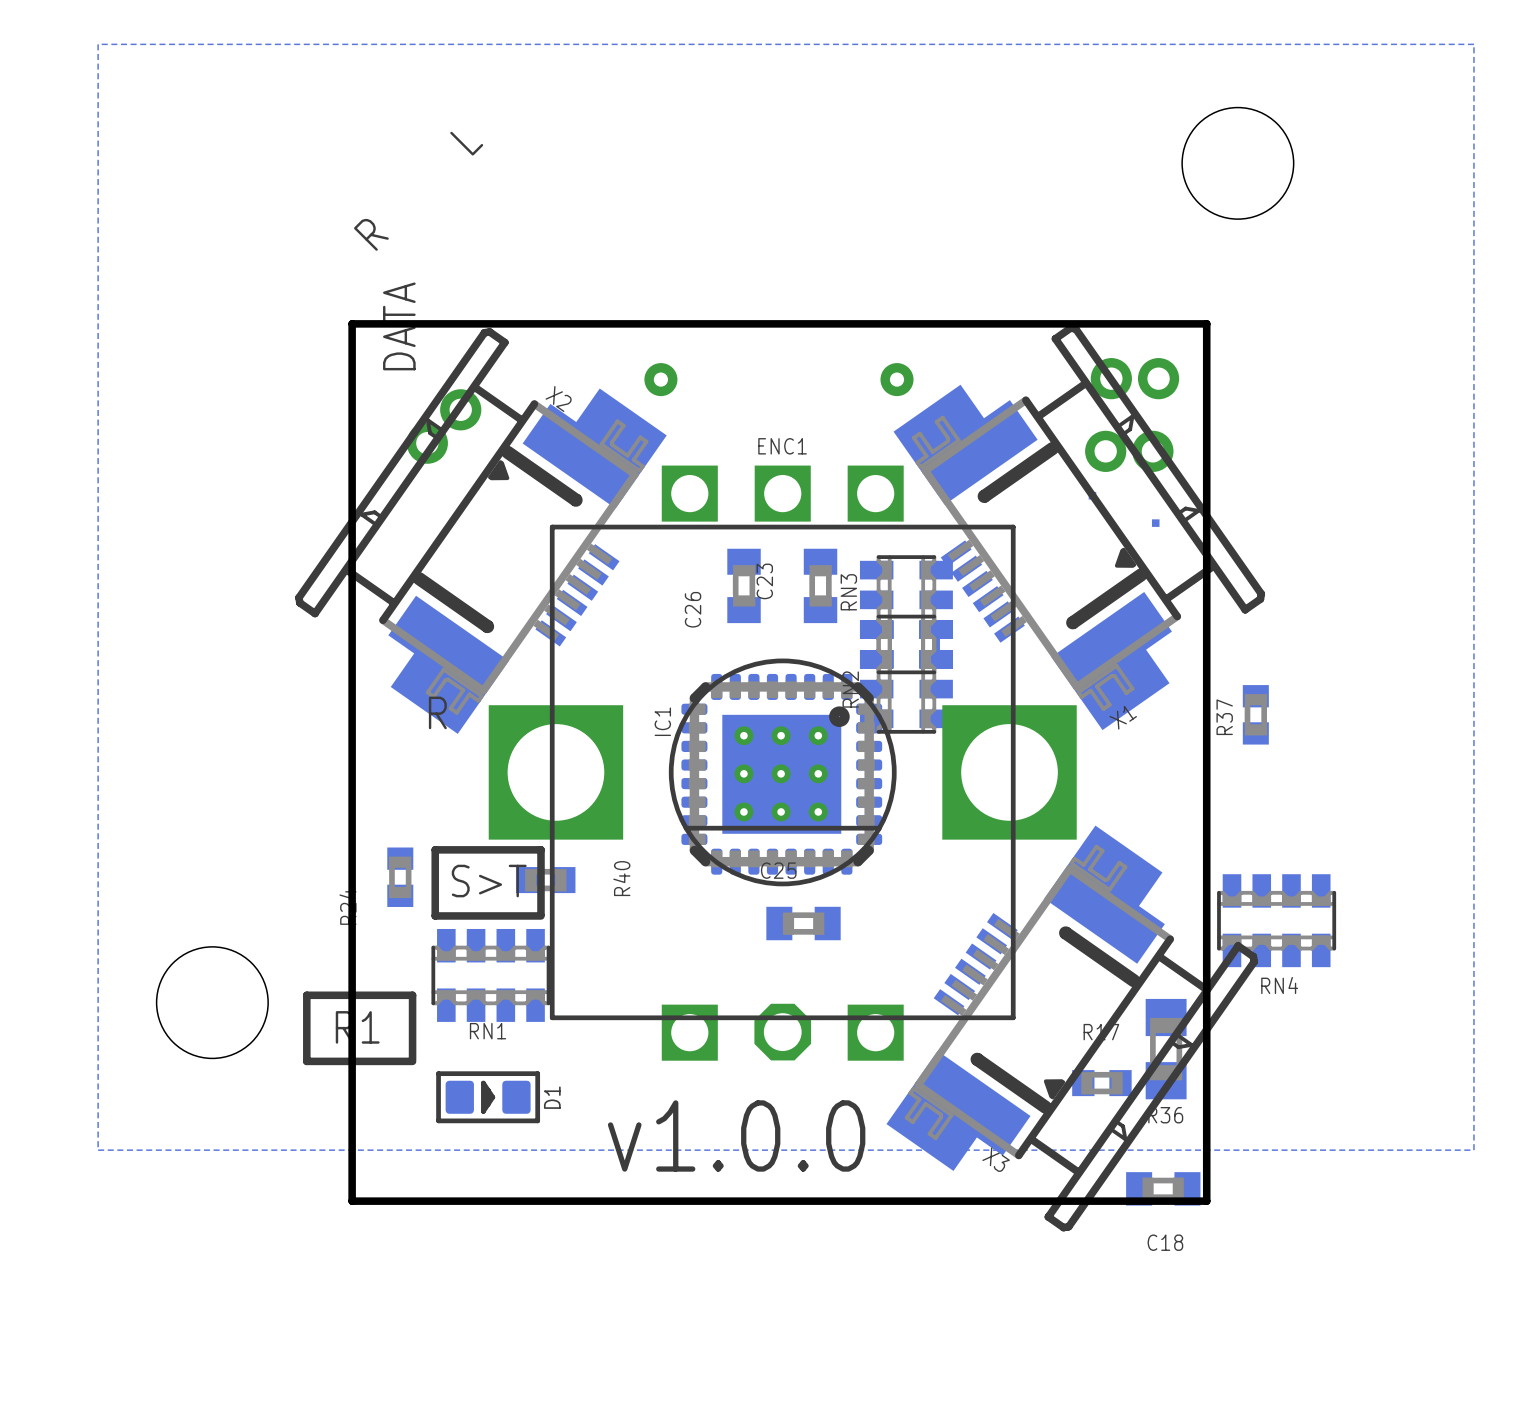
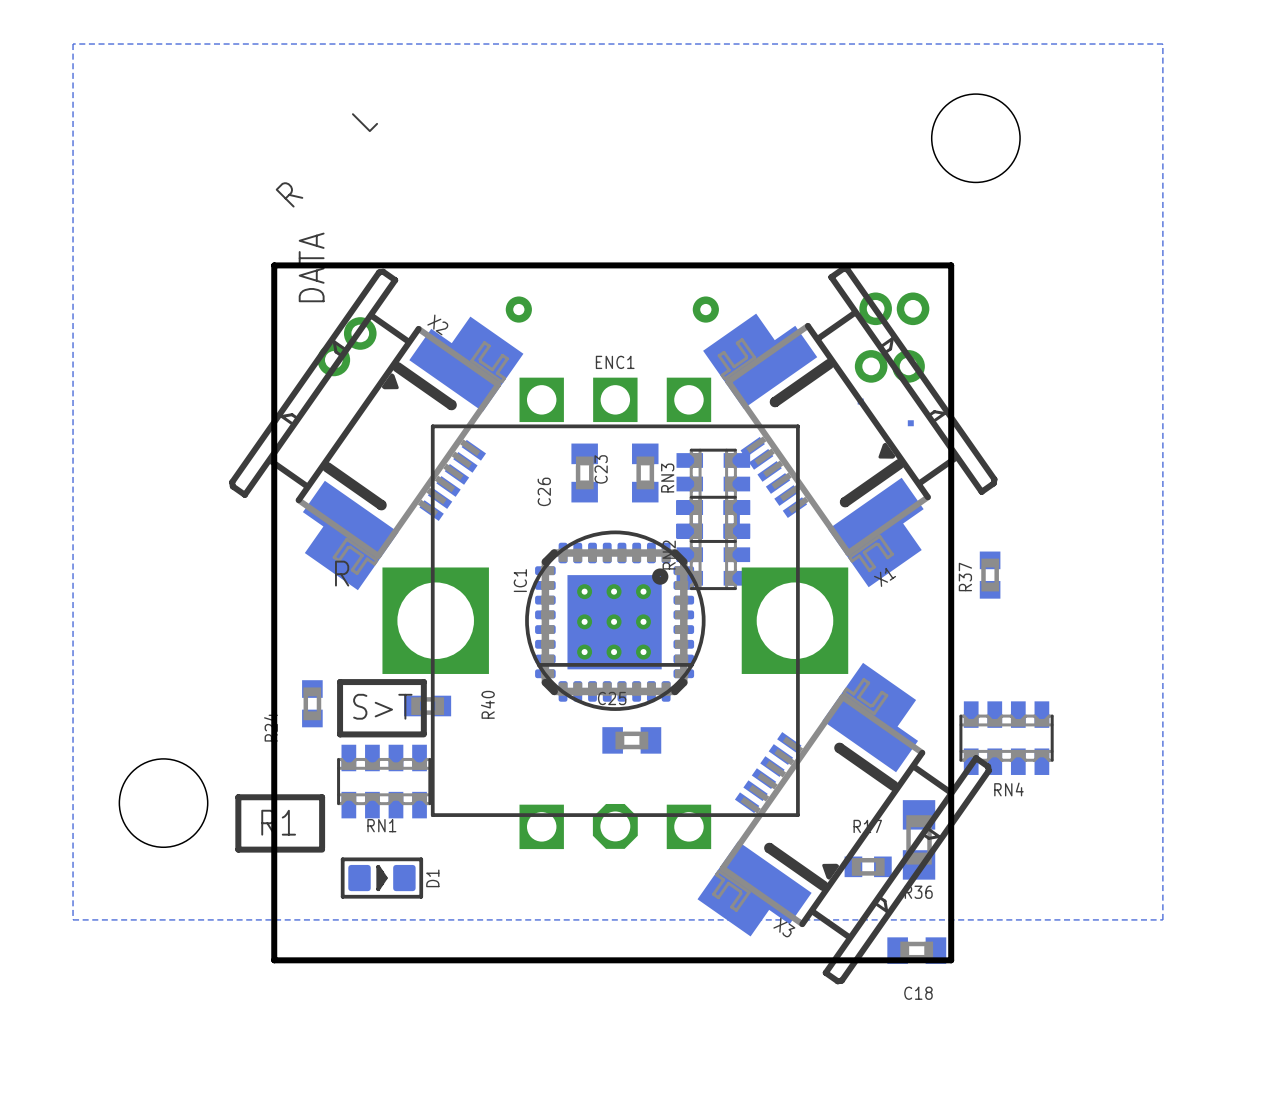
text: v1.0.0 (736, 1135) -> none

